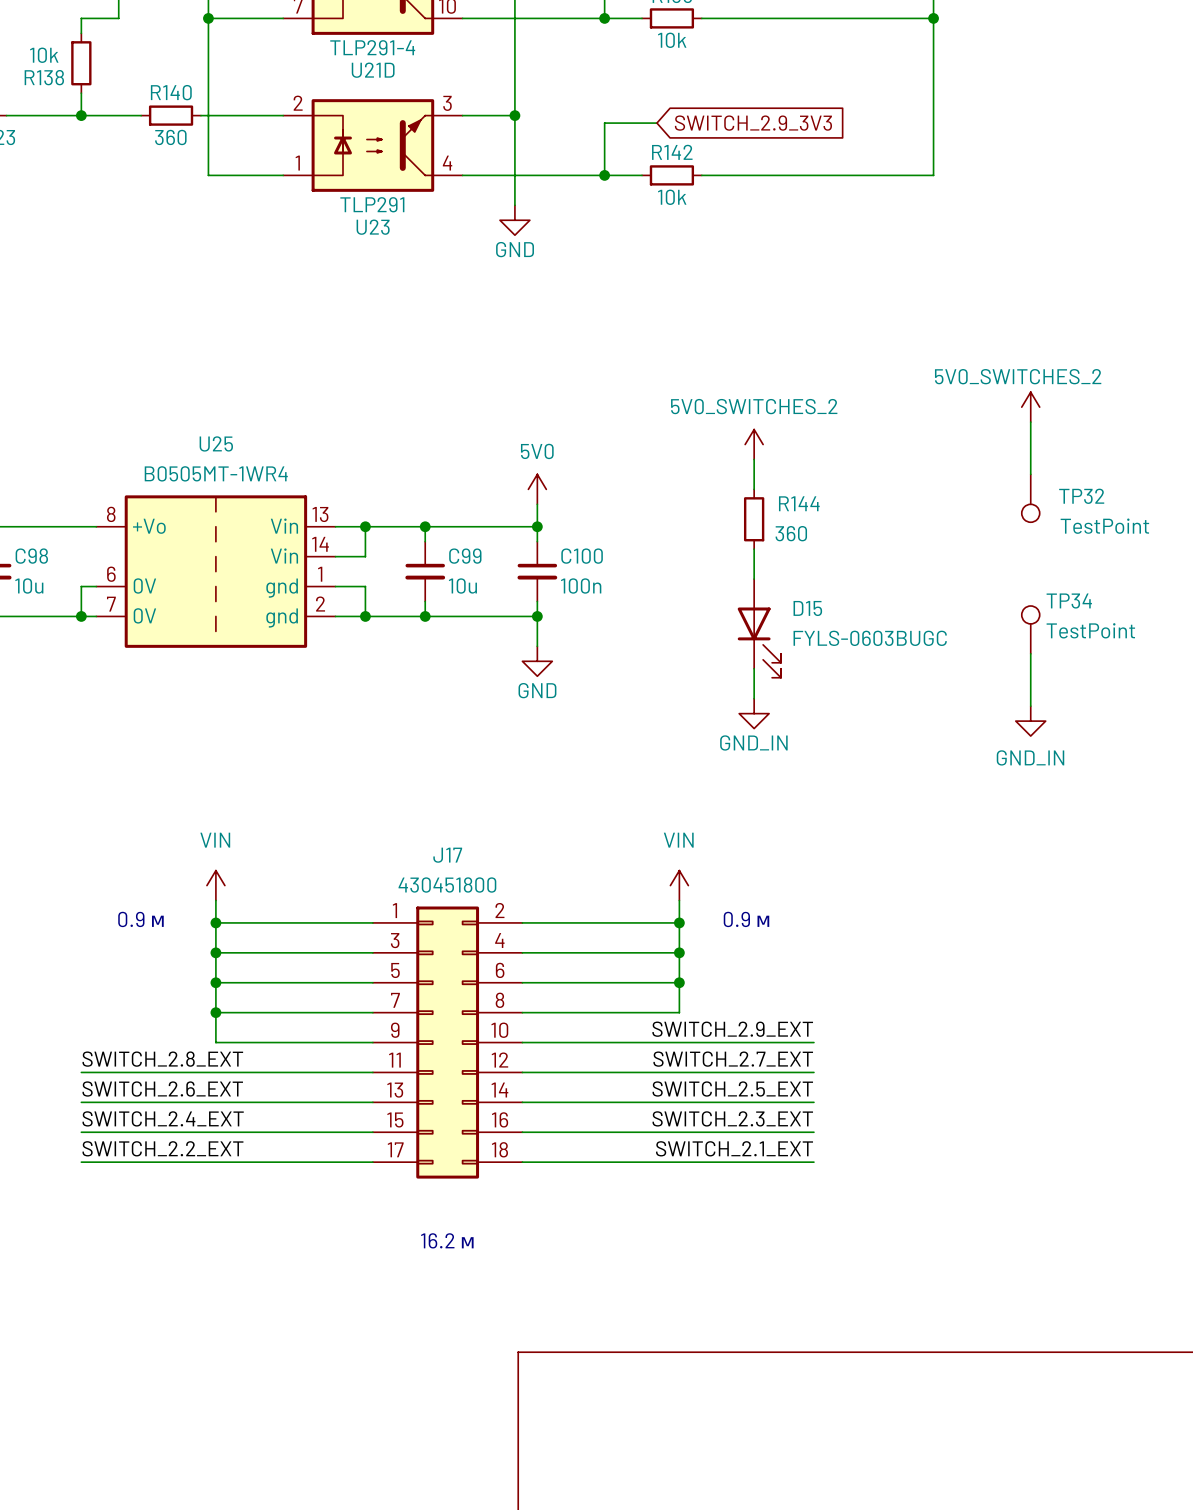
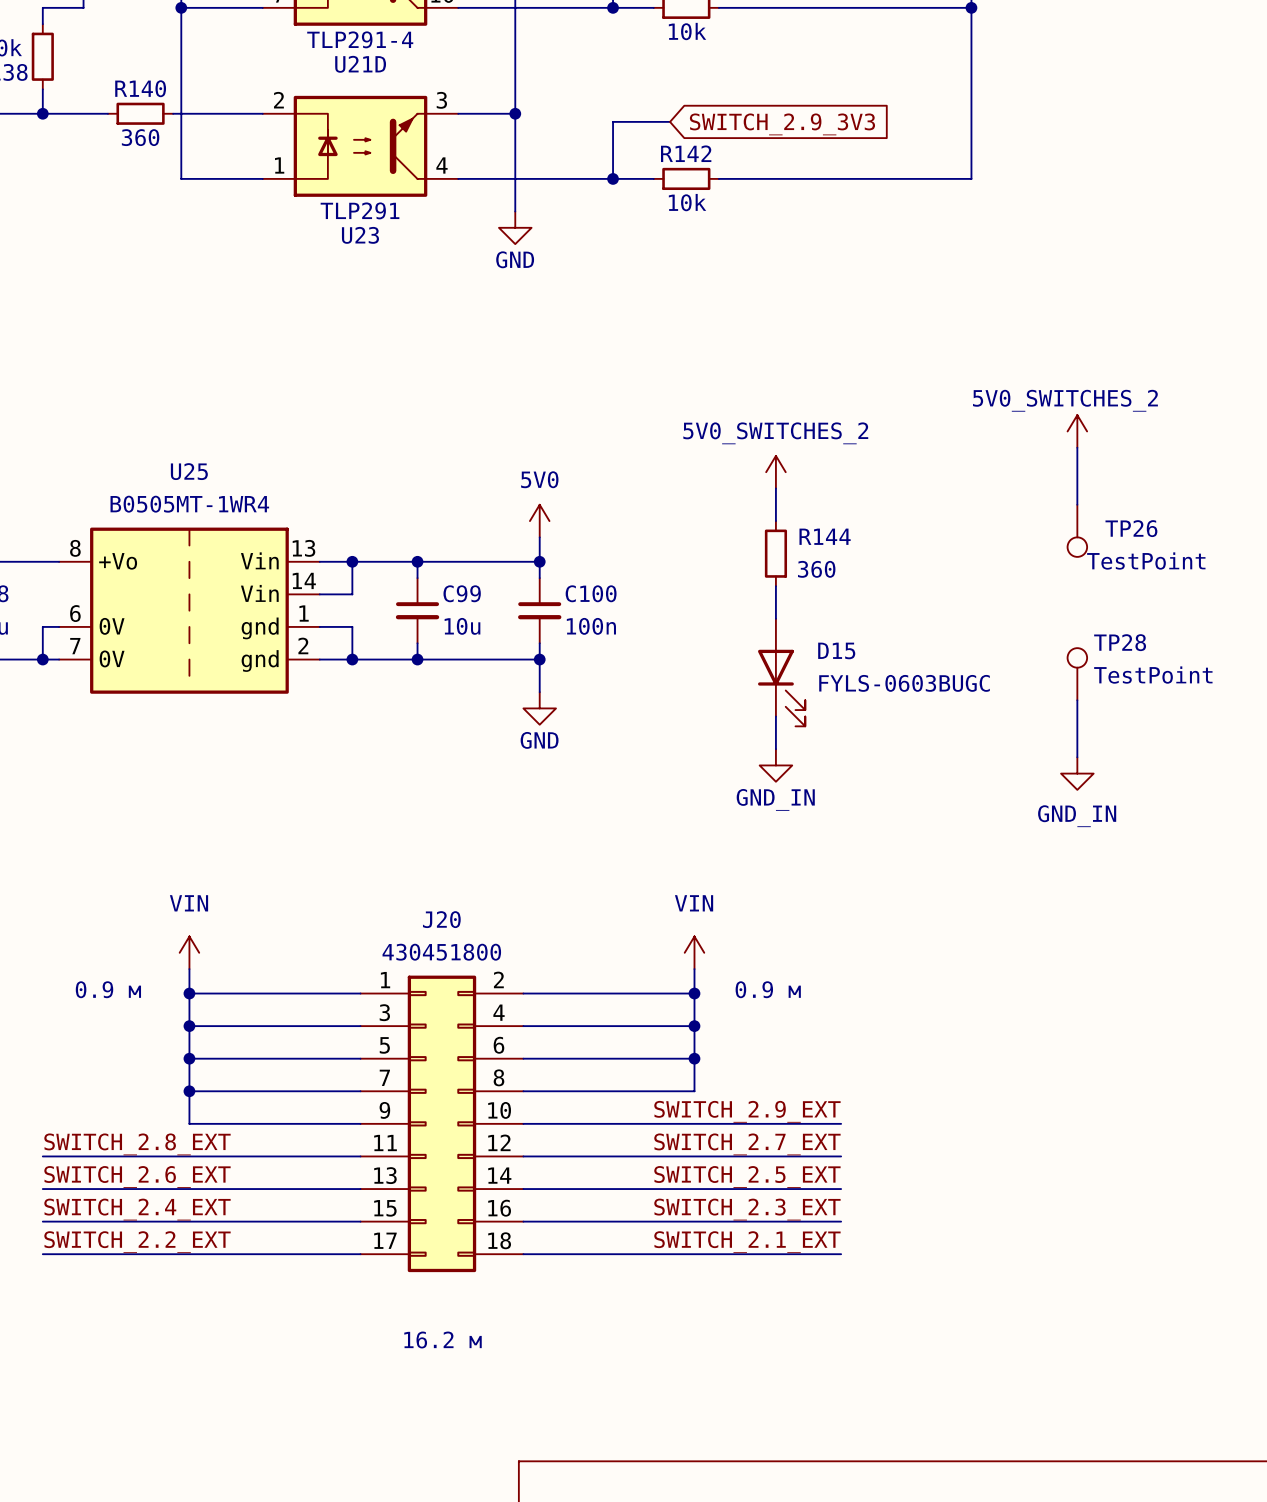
TP32 name: TP32 (1081, 496) -> TP26 (1131, 528)
TP34 name: TP34 (1069, 601) -> TP28 (1120, 642)
J17 name: J17 (447, 855) -> J20 (441, 919)

